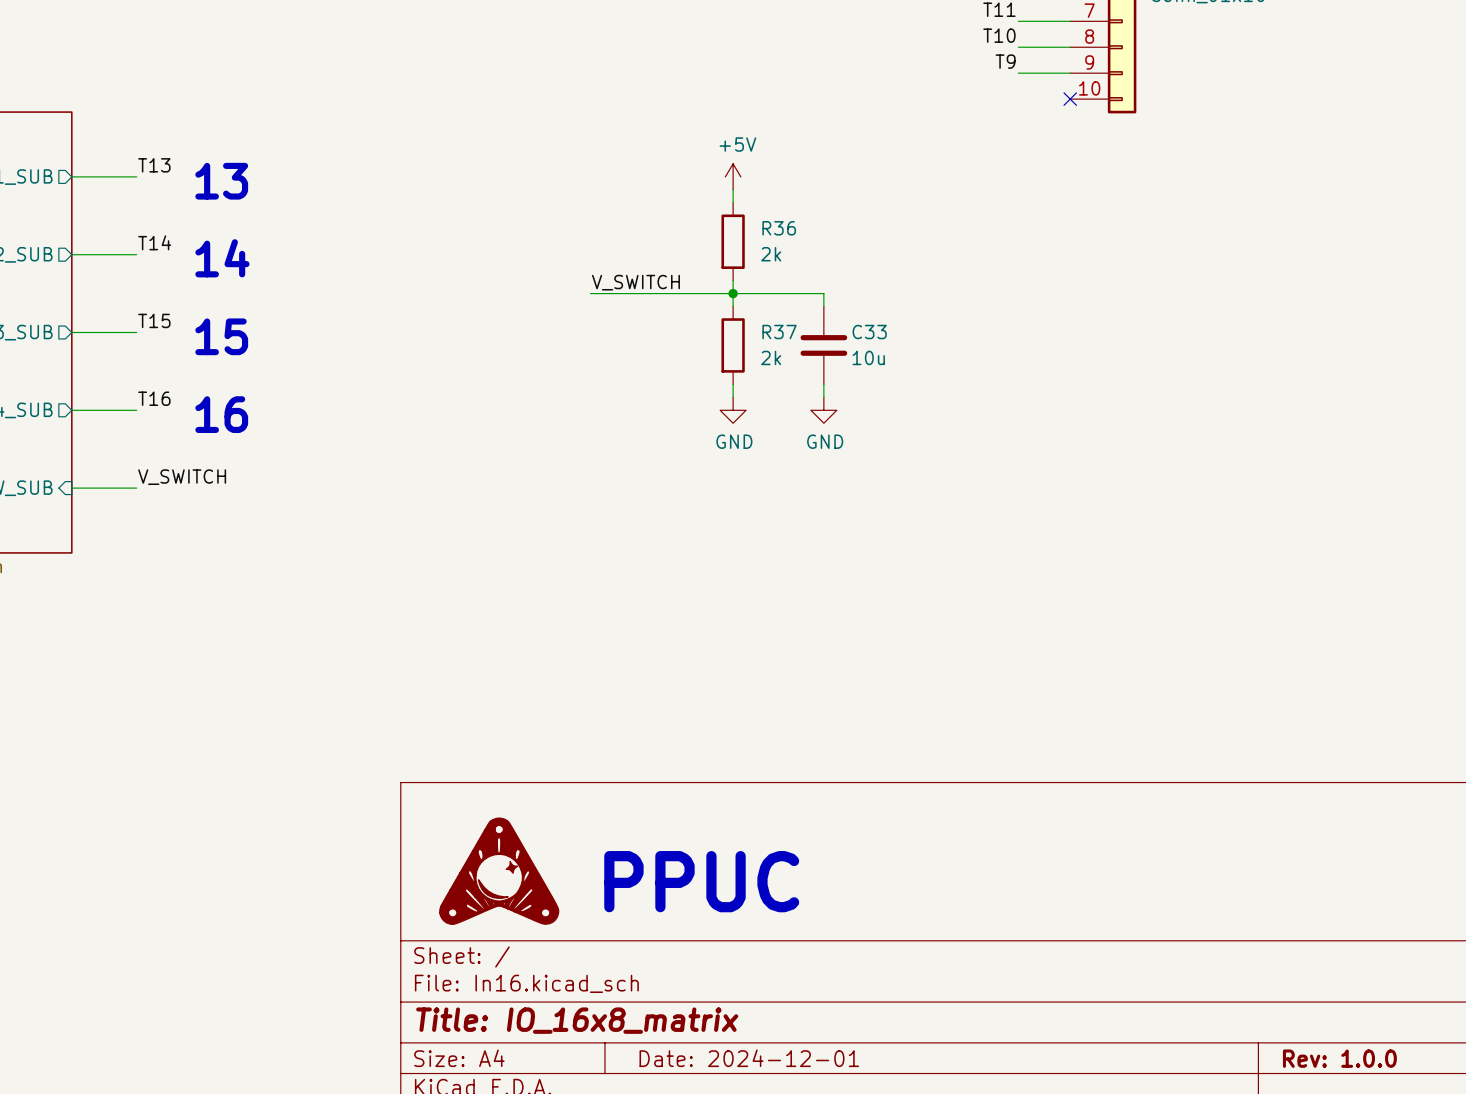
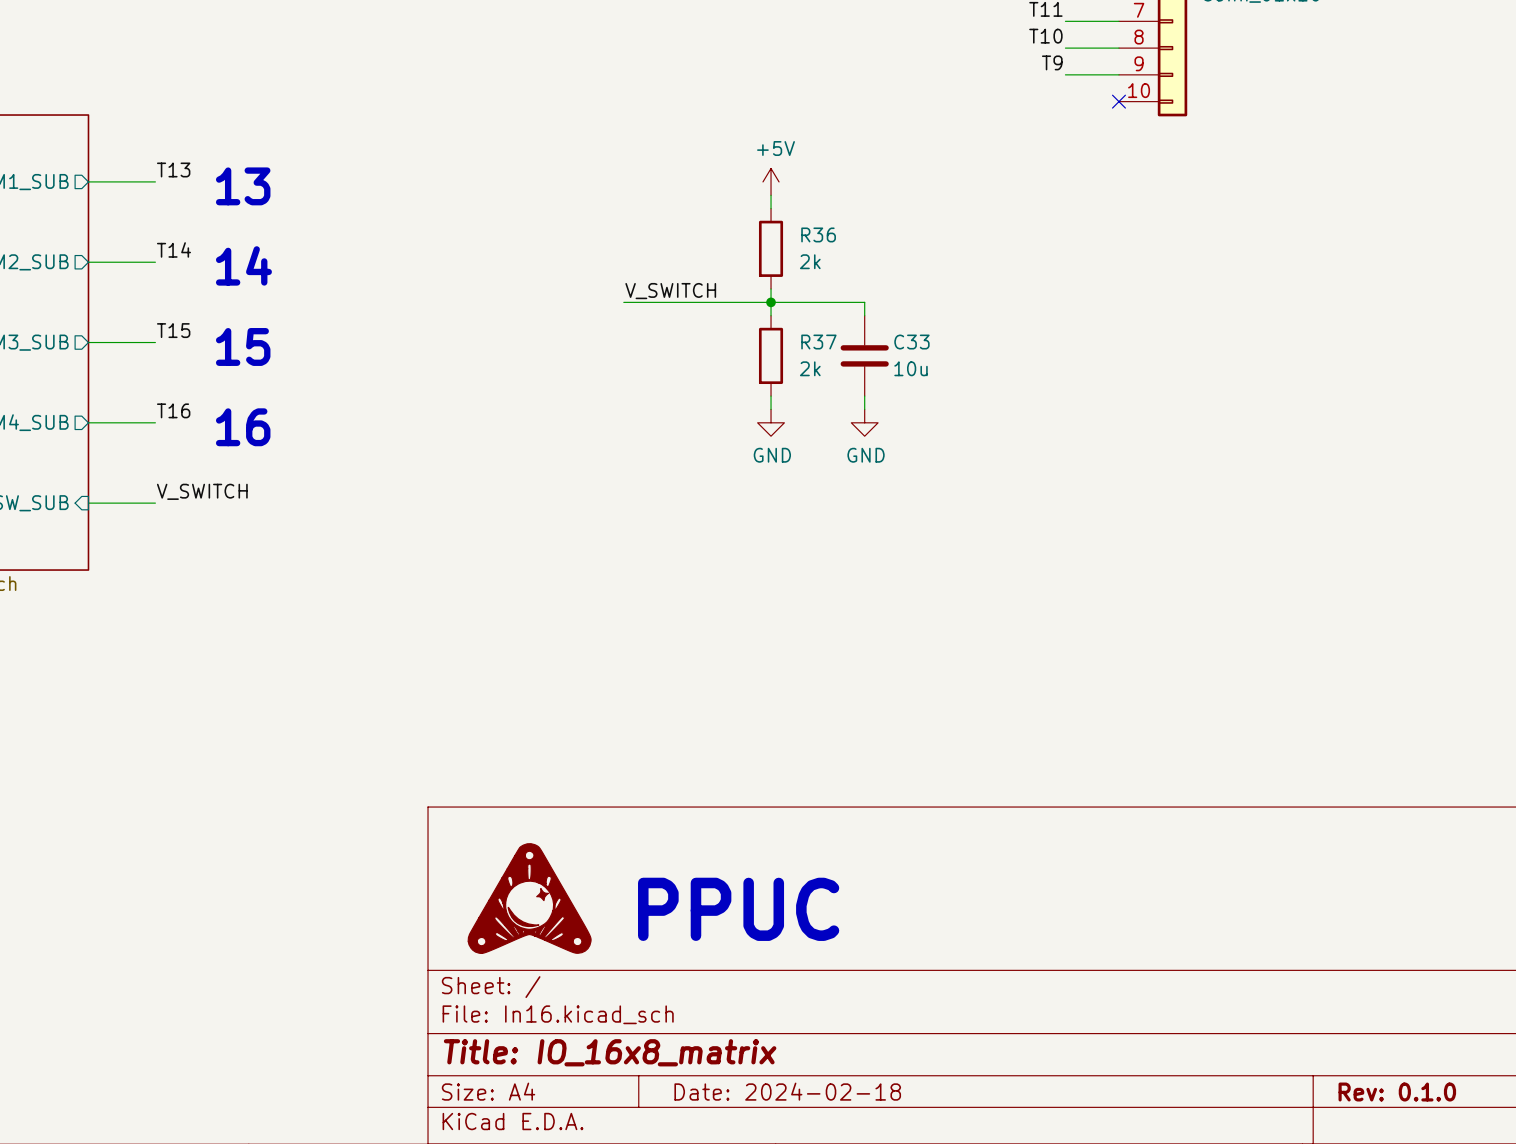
title block: Date: 2024-12-01 (749, 1058) -> Date: 2024-02-18 (787, 1091)
title block: Rev: 1.0.0 (1339, 1058) -> Rev: 0.1.0 (1397, 1092)

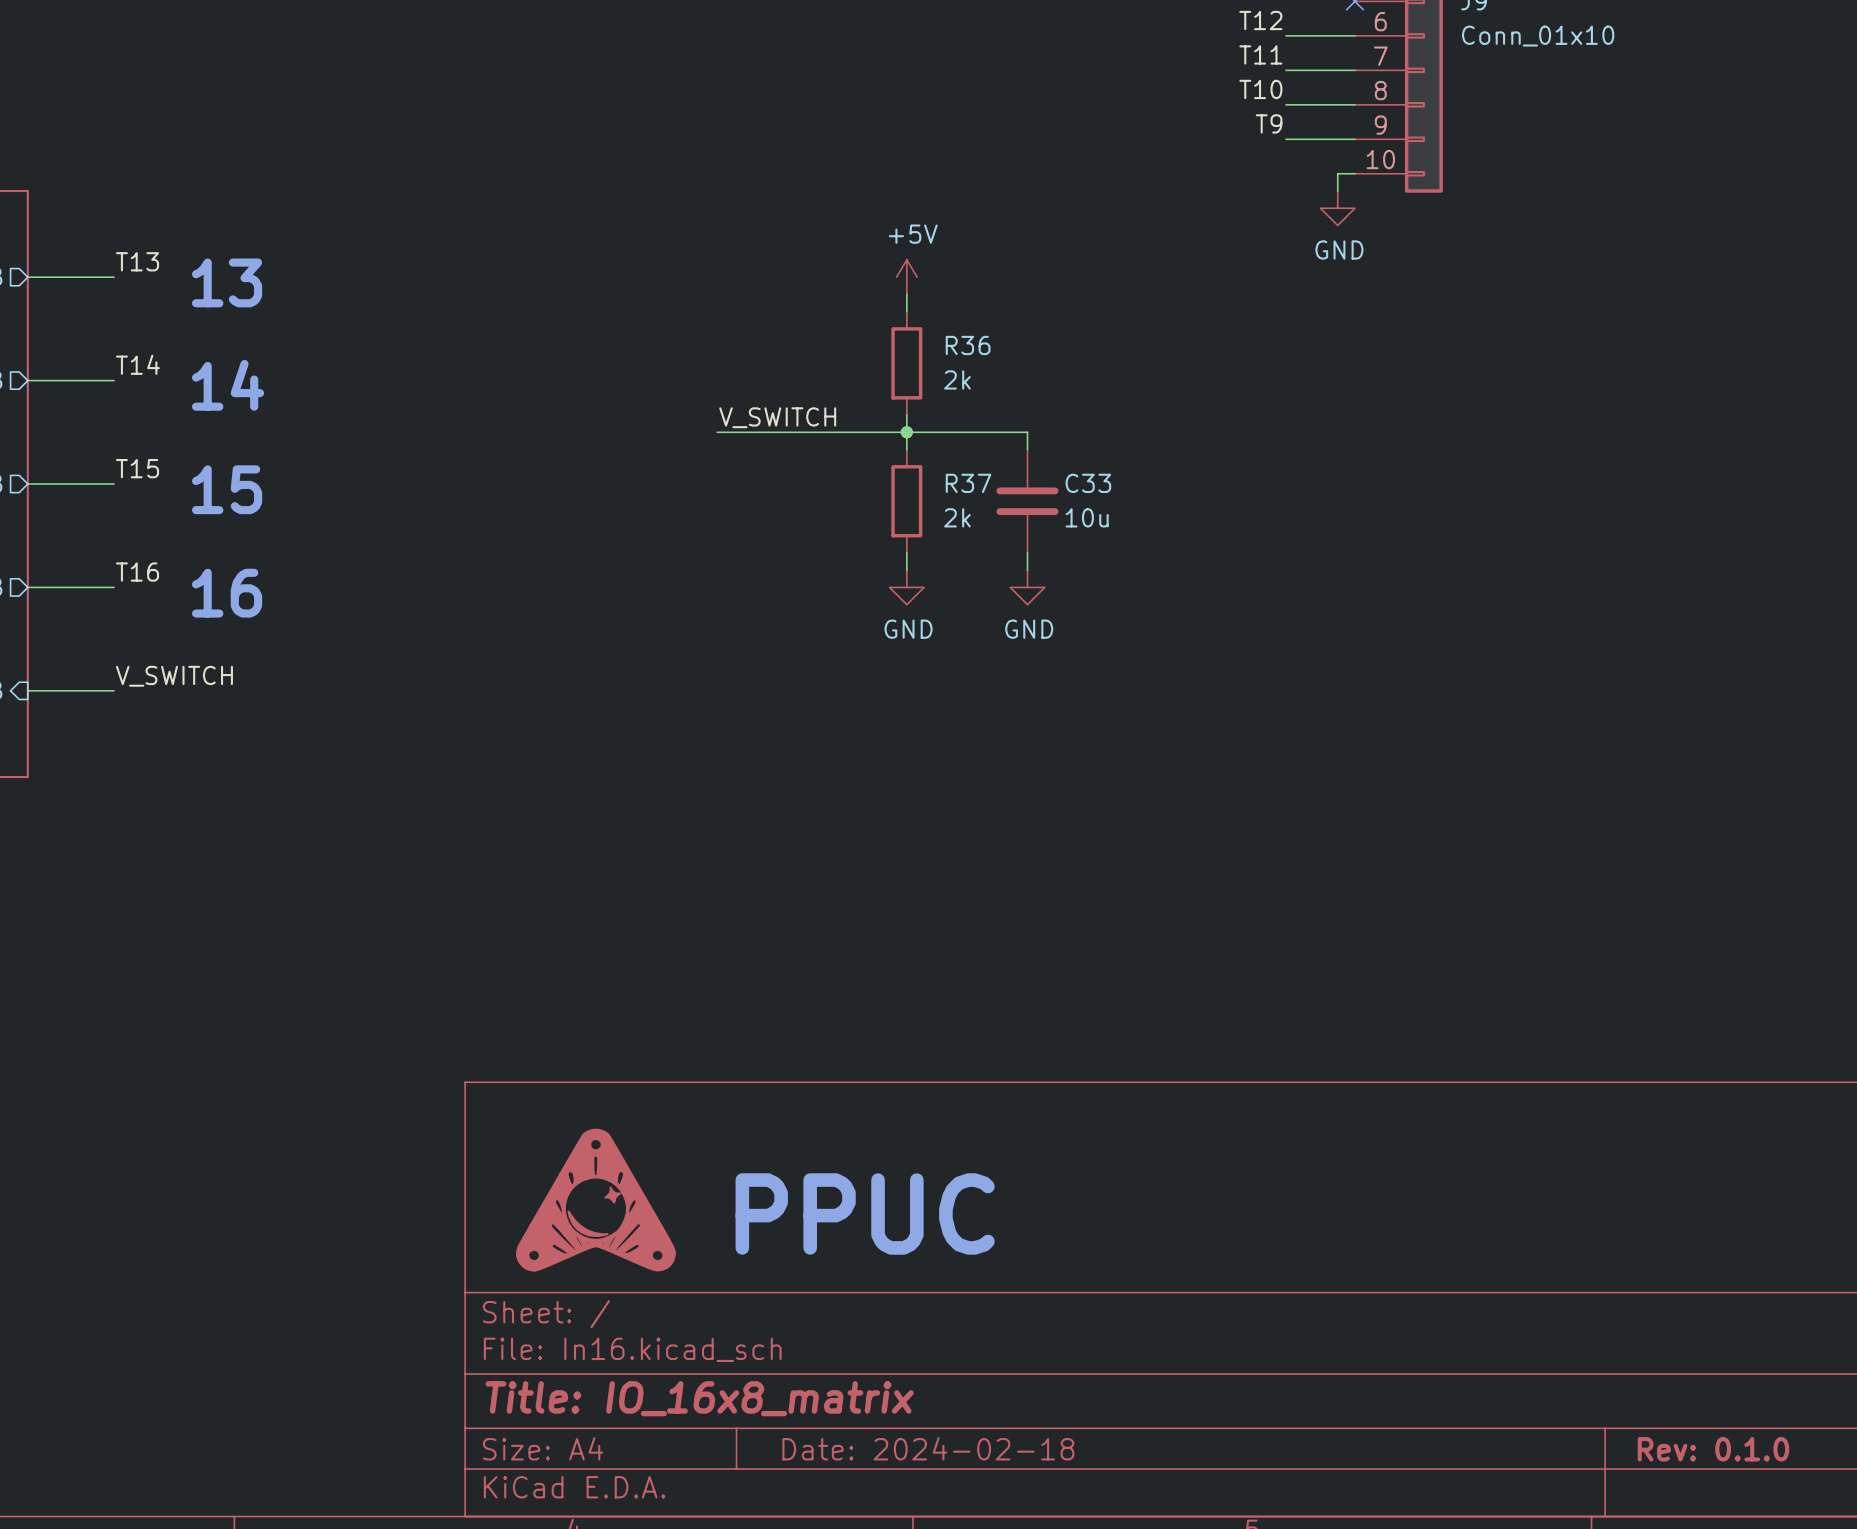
wire: none -> (1354, 173) (1337, 173) (1337, 191)
no-connect mark: (1118, 101) -> none
power symbol: none -> GND (1337, 208)

